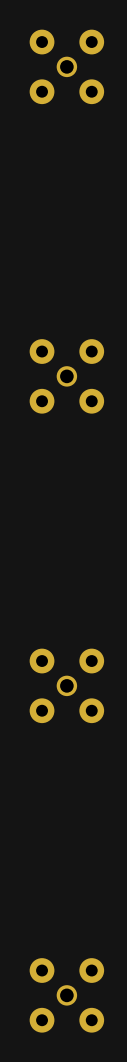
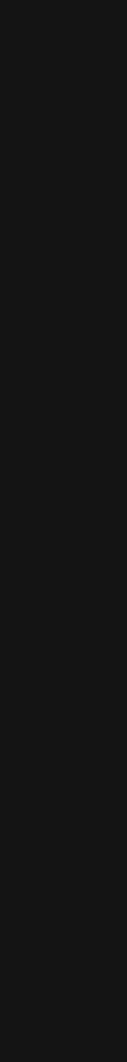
part: (66, 66) -> none
part: (66, 376) -> none
part: (66, 685) -> none
part: (66, 995) -> none

